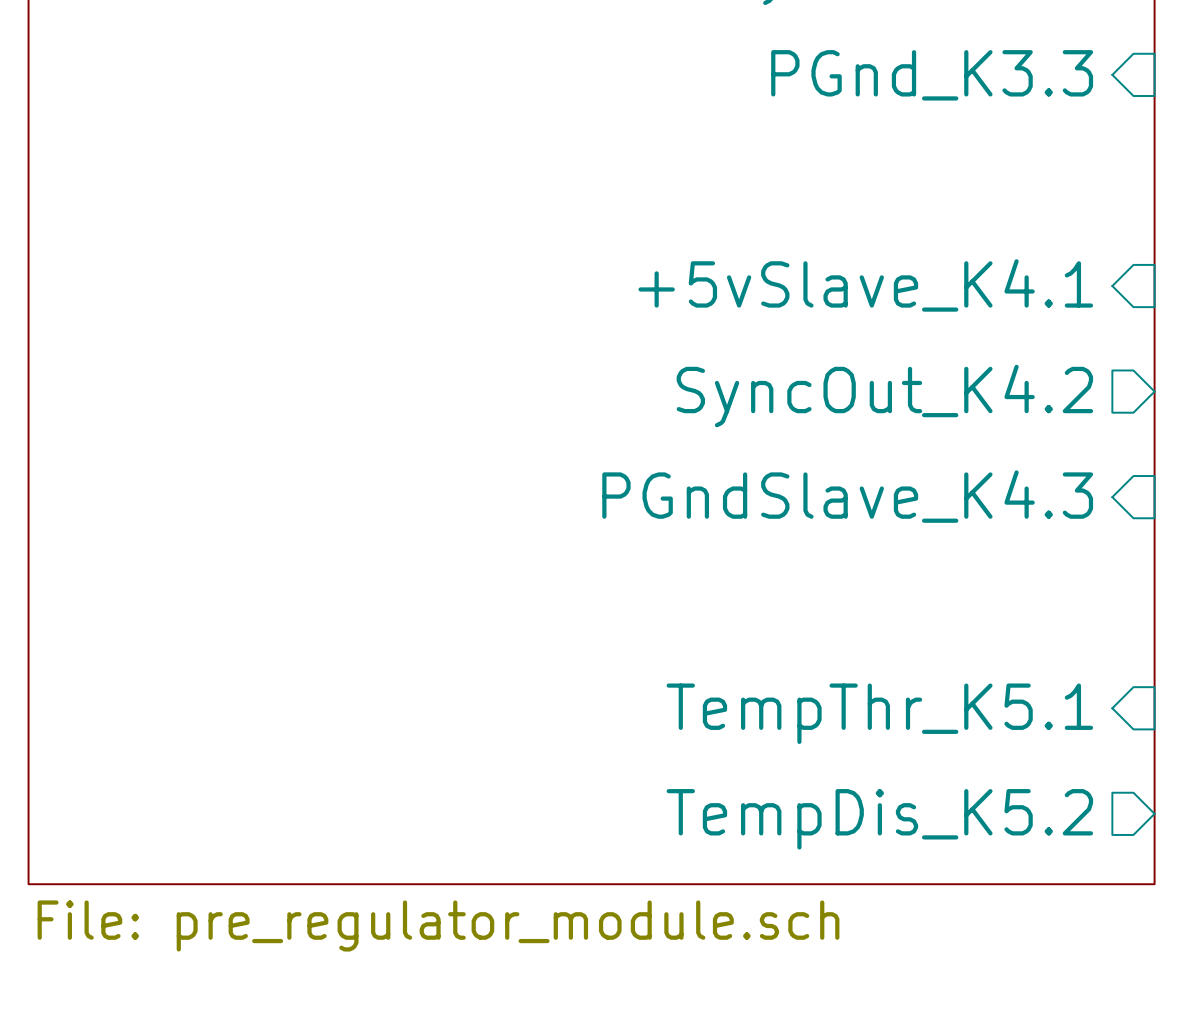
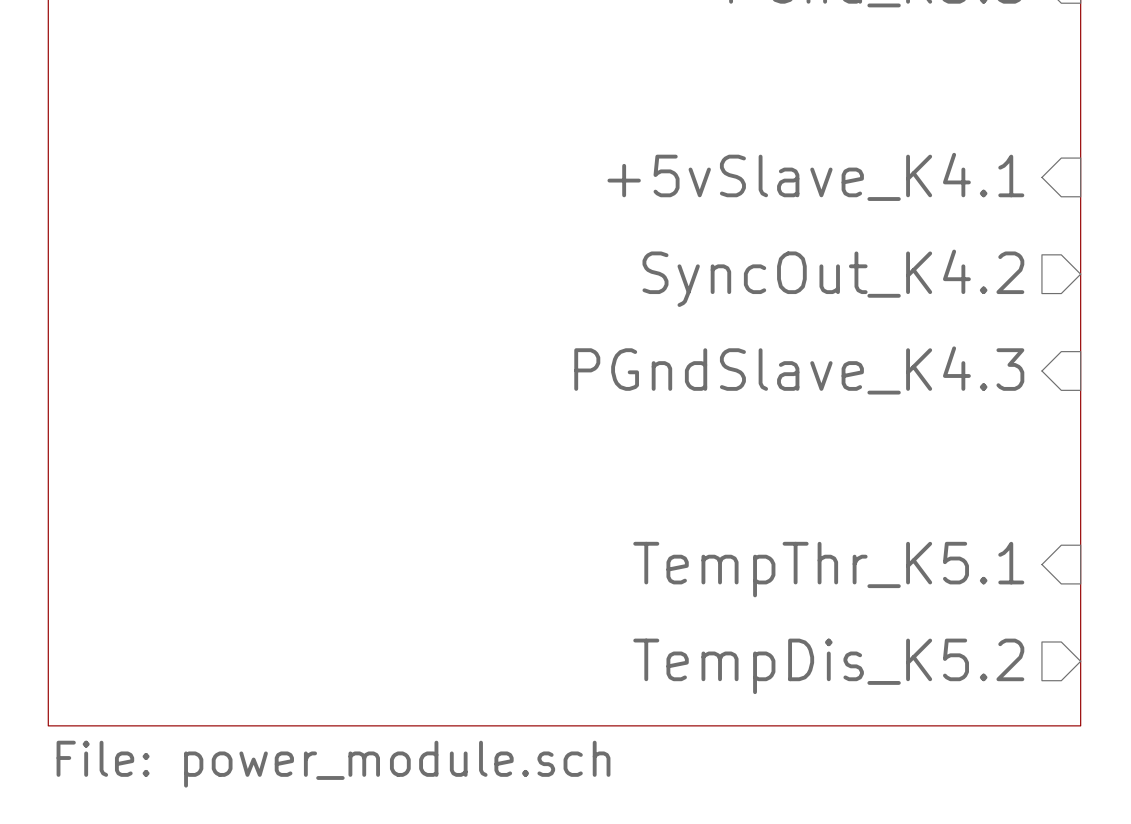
sheet value: File: pre_regulator_module.sch (438, 925) -> File: power_module.sch (333, 764)

